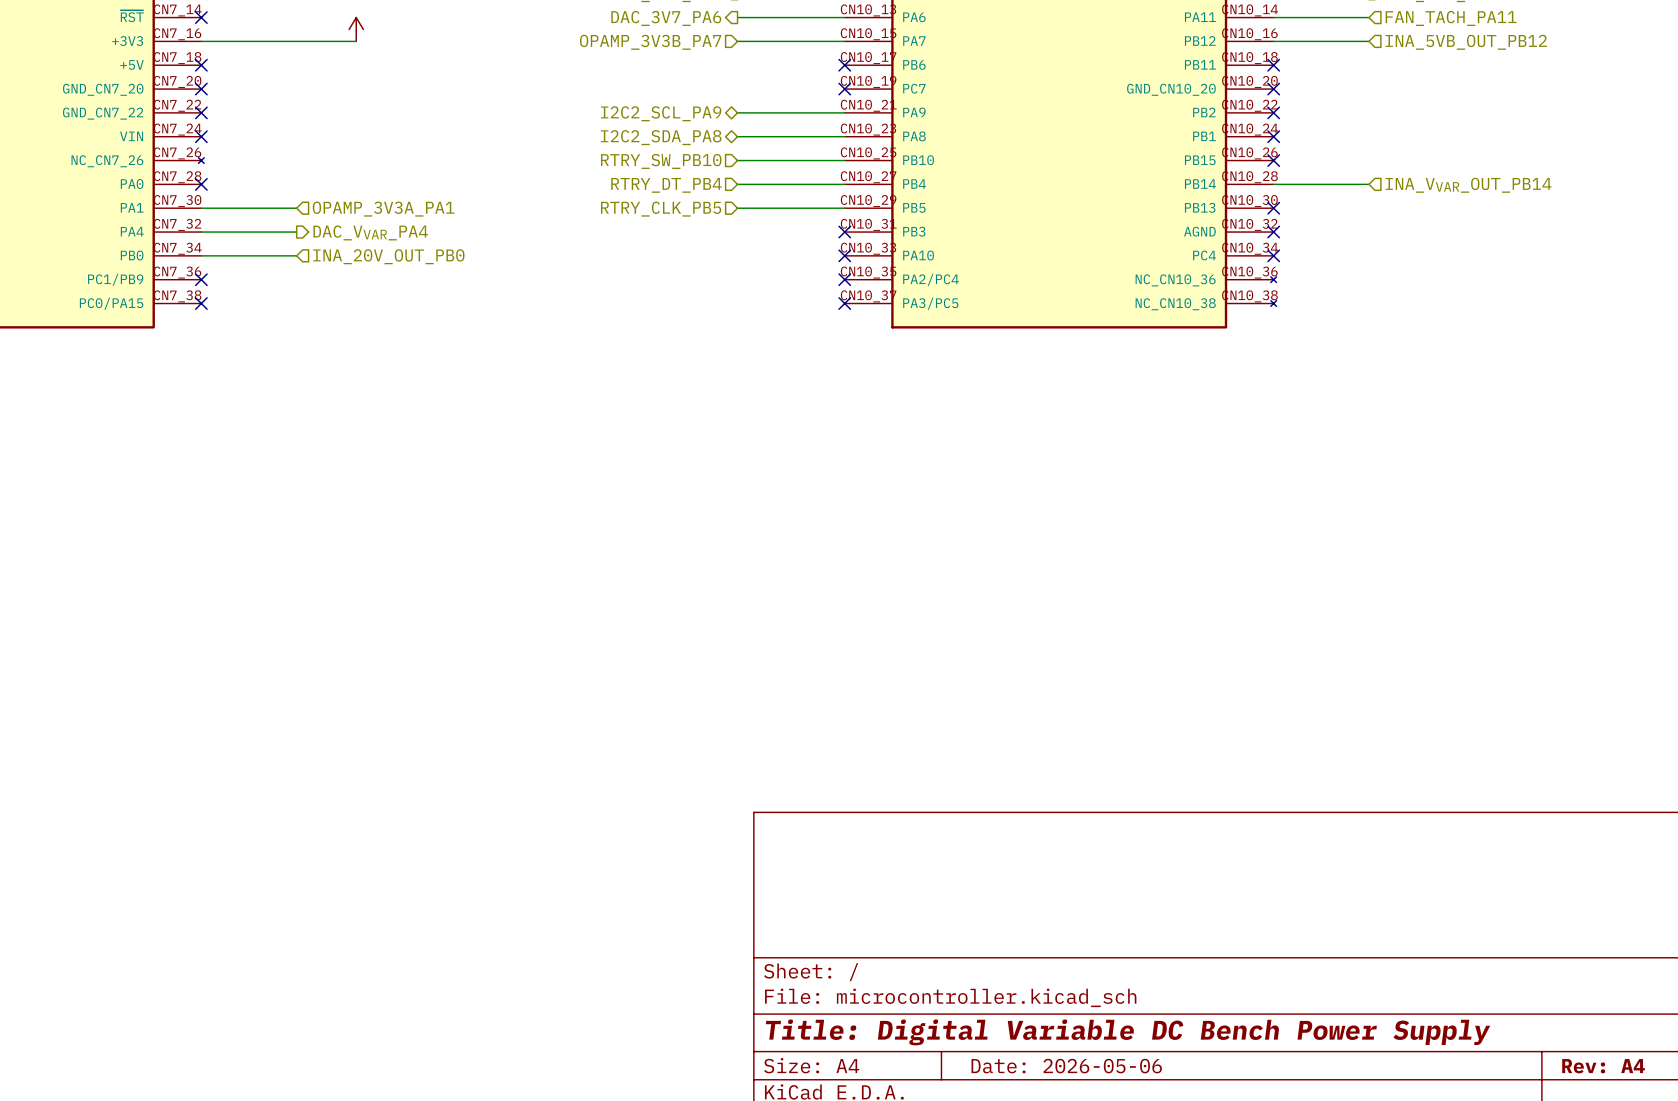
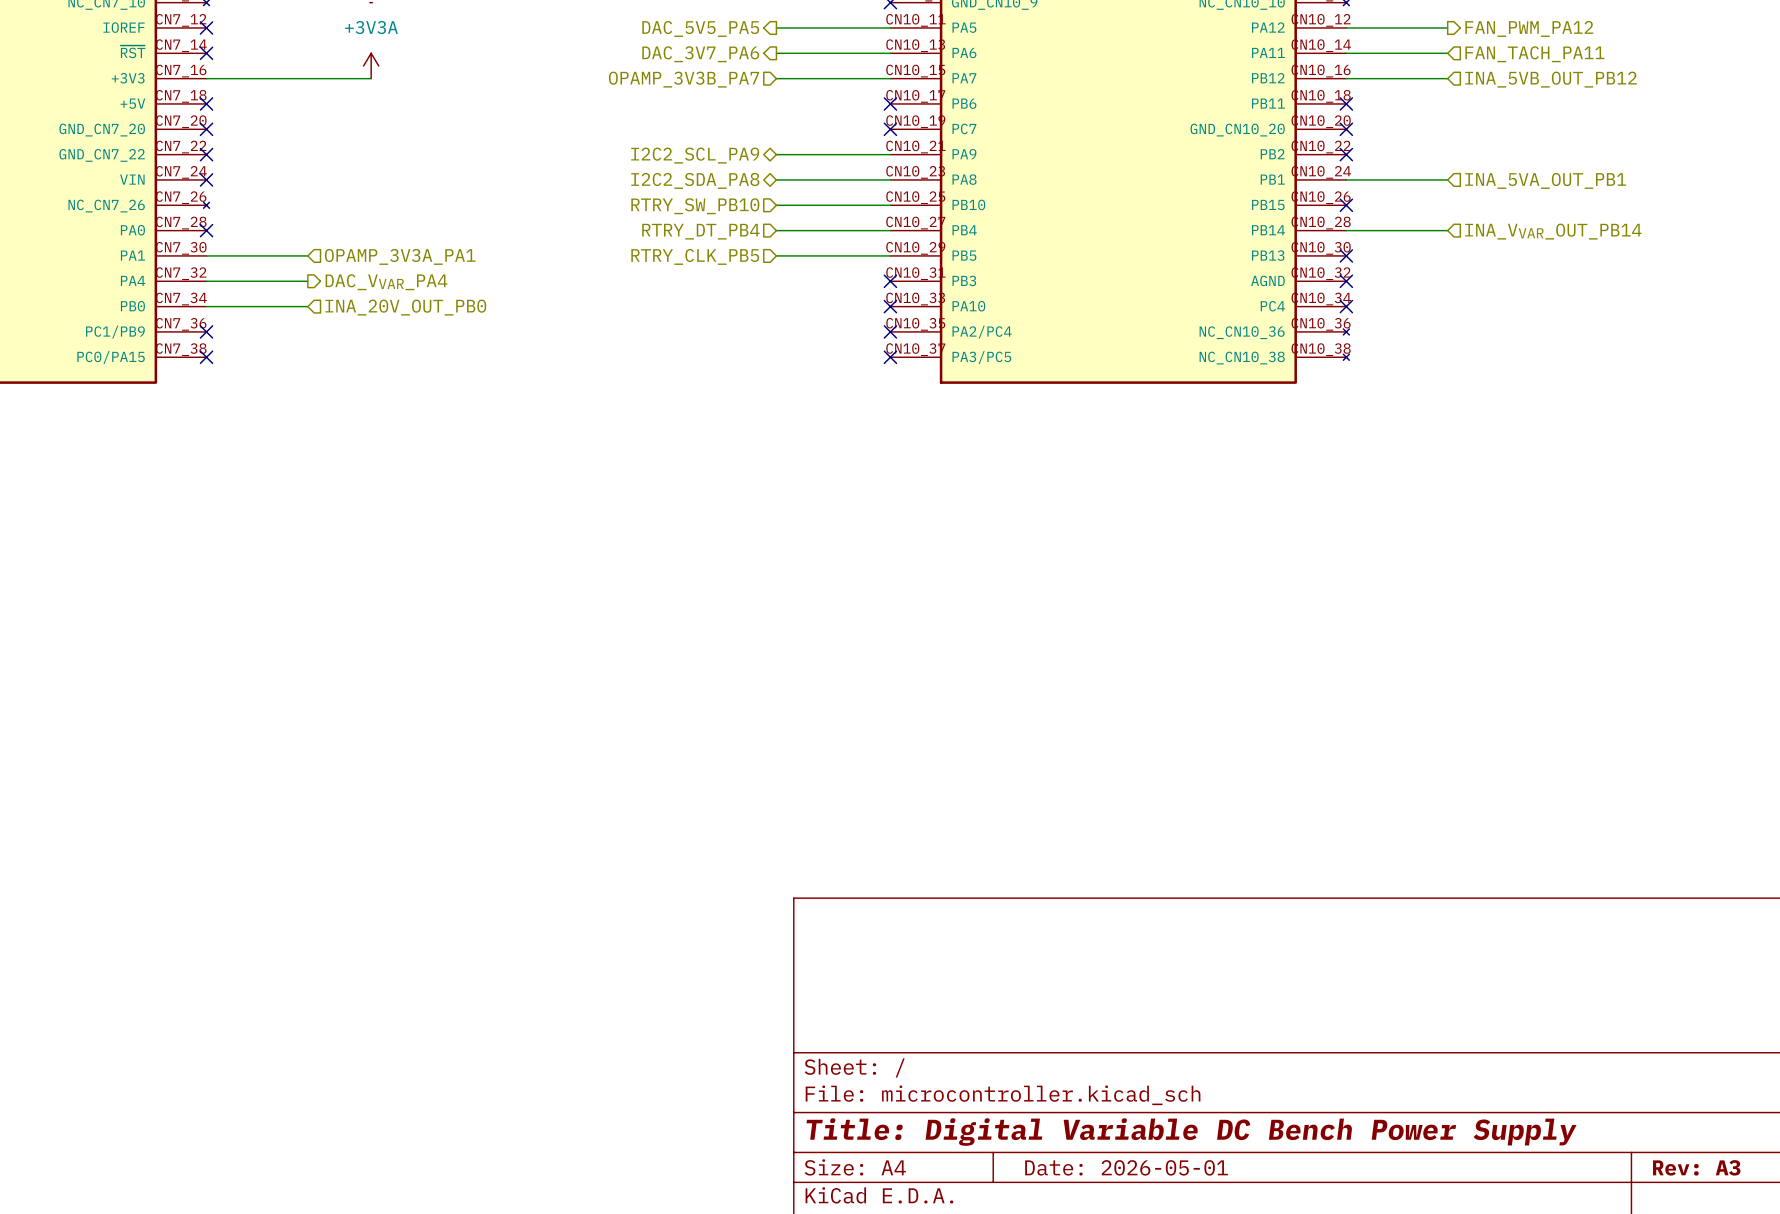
wire: none -> (1346, 179) (1447, 179)
no-connect mark: (1273, 136) -> none
hierarchical label: none -> INA_5VA_OUT_PB1 (1545, 180)
title block: Date: 2026-05-06 (1066, 1066) -> Date: 2026-05-01 (1126, 1167)
title block: Rev: A4 (1603, 1066) -> Rev: A3 (1696, 1167)

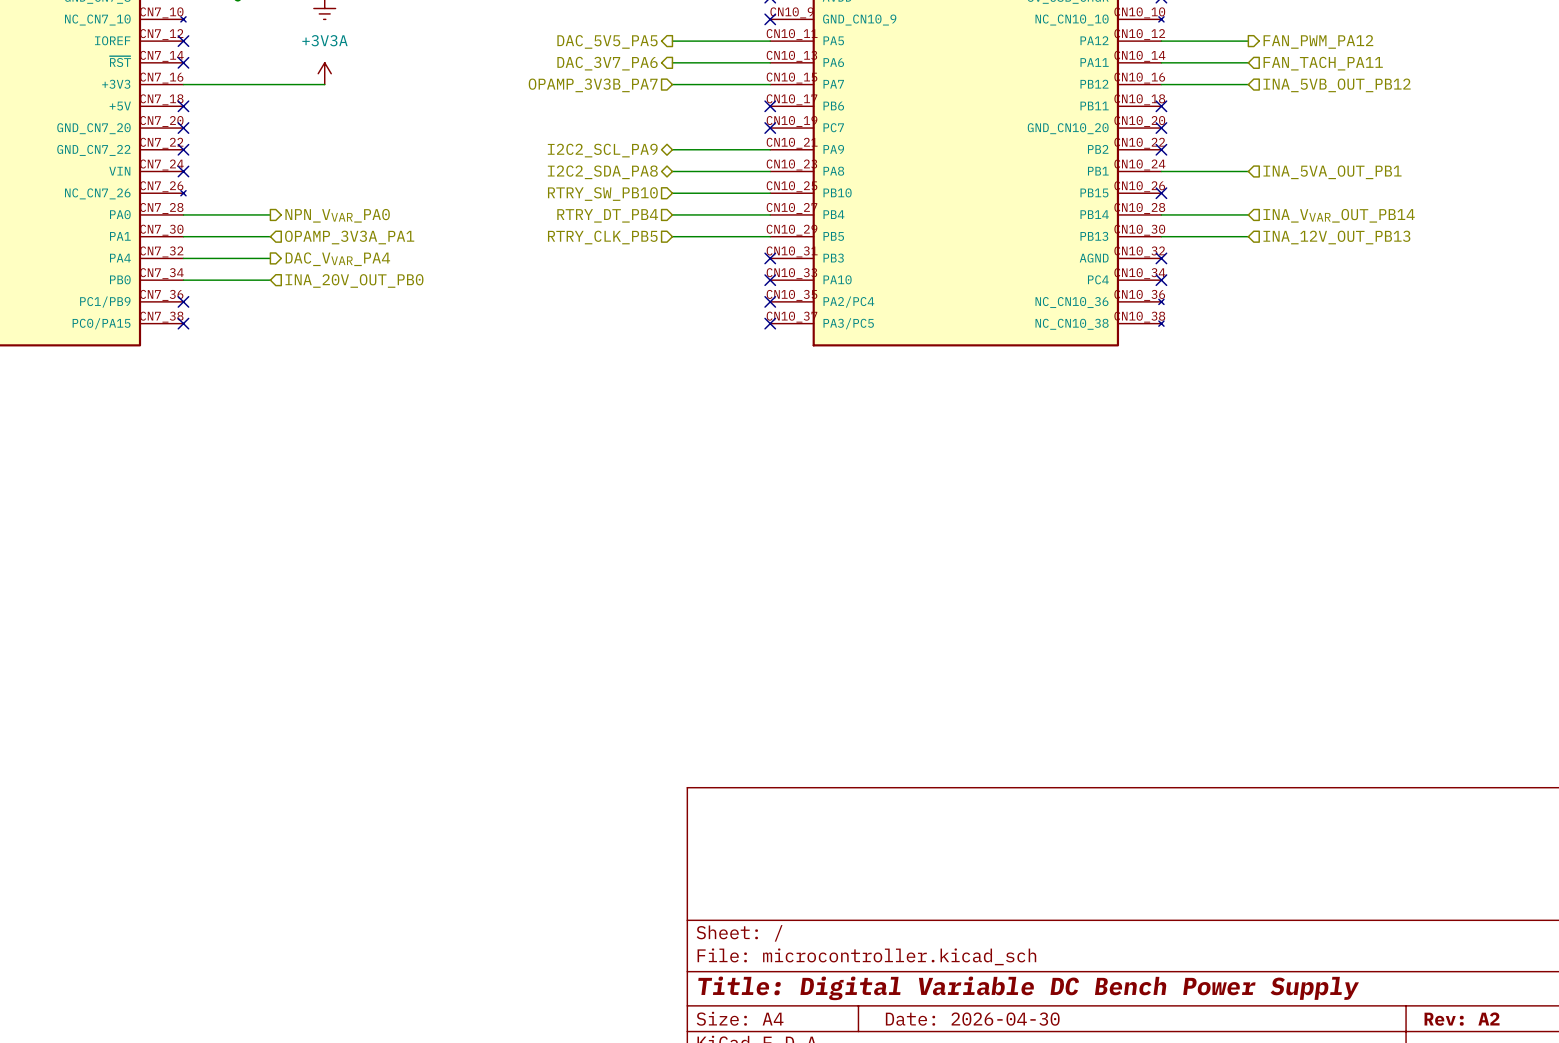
wire: none -> (183, 214) (270, 214)
no-connect mark: (206, 230) -> none
hierarchical label: none -> NPN_VVAR_PA0 (337, 215)
wire: none -> (1161, 236) (1248, 236)
no-connect mark: (1346, 255) -> none
hierarchical label: none -> INA_12V_OUT_PB13 (1336, 237)
title block: Date: 2026-05-01 (1126, 1167) -> Date: 2026-04-30 (972, 1019)
title block: Rev: A3 (1696, 1167) -> Rev: A2 (1462, 1019)

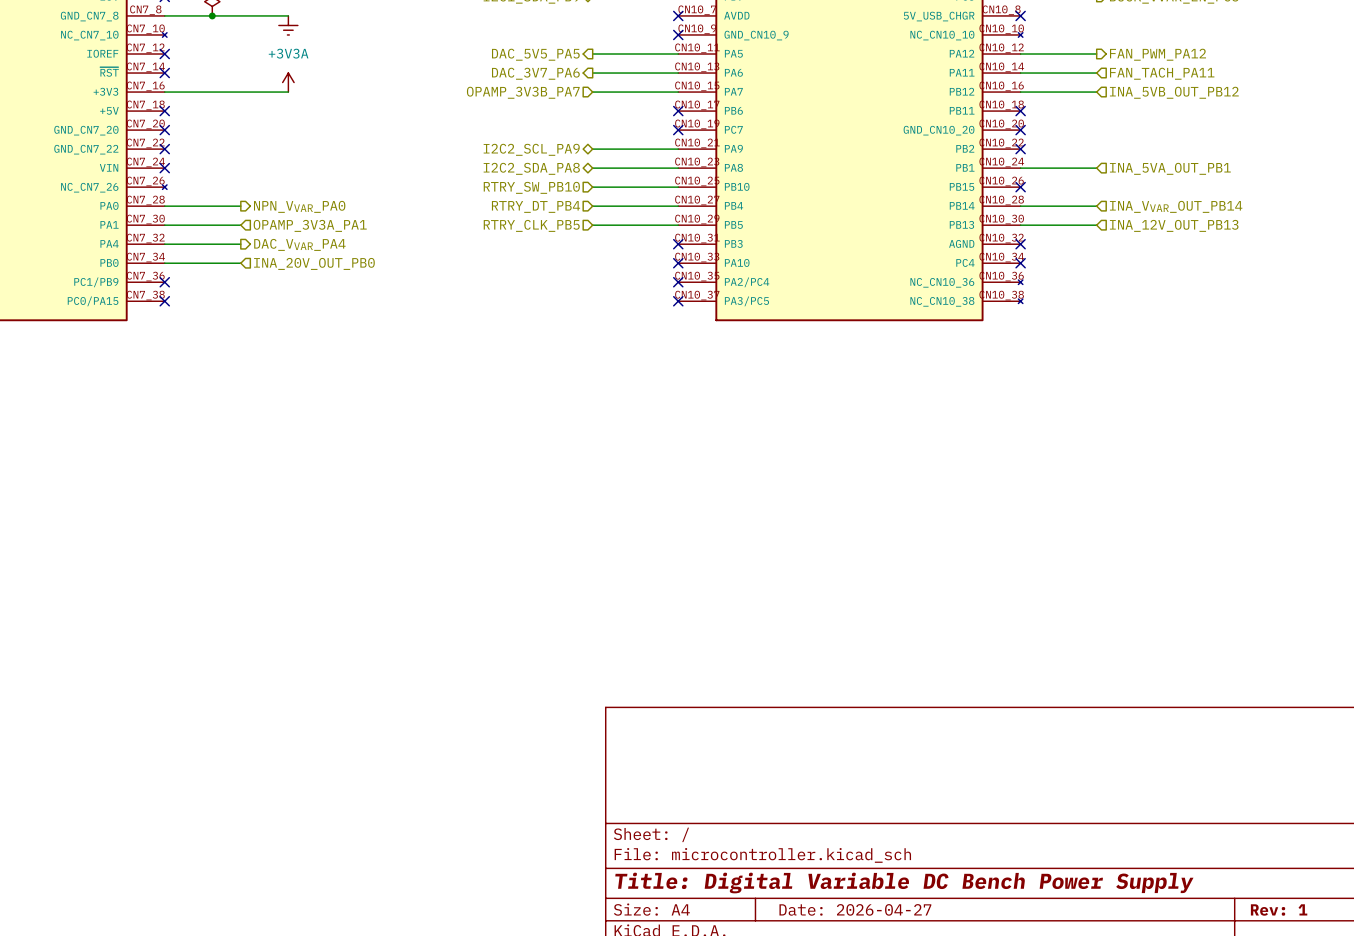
title block: Date: 2026-04-30 (972, 1019) -> Date: 2026-04-27 (855, 909)
title block: Rev: A2 (1462, 1019) -> Rev: 1 (1279, 909)

